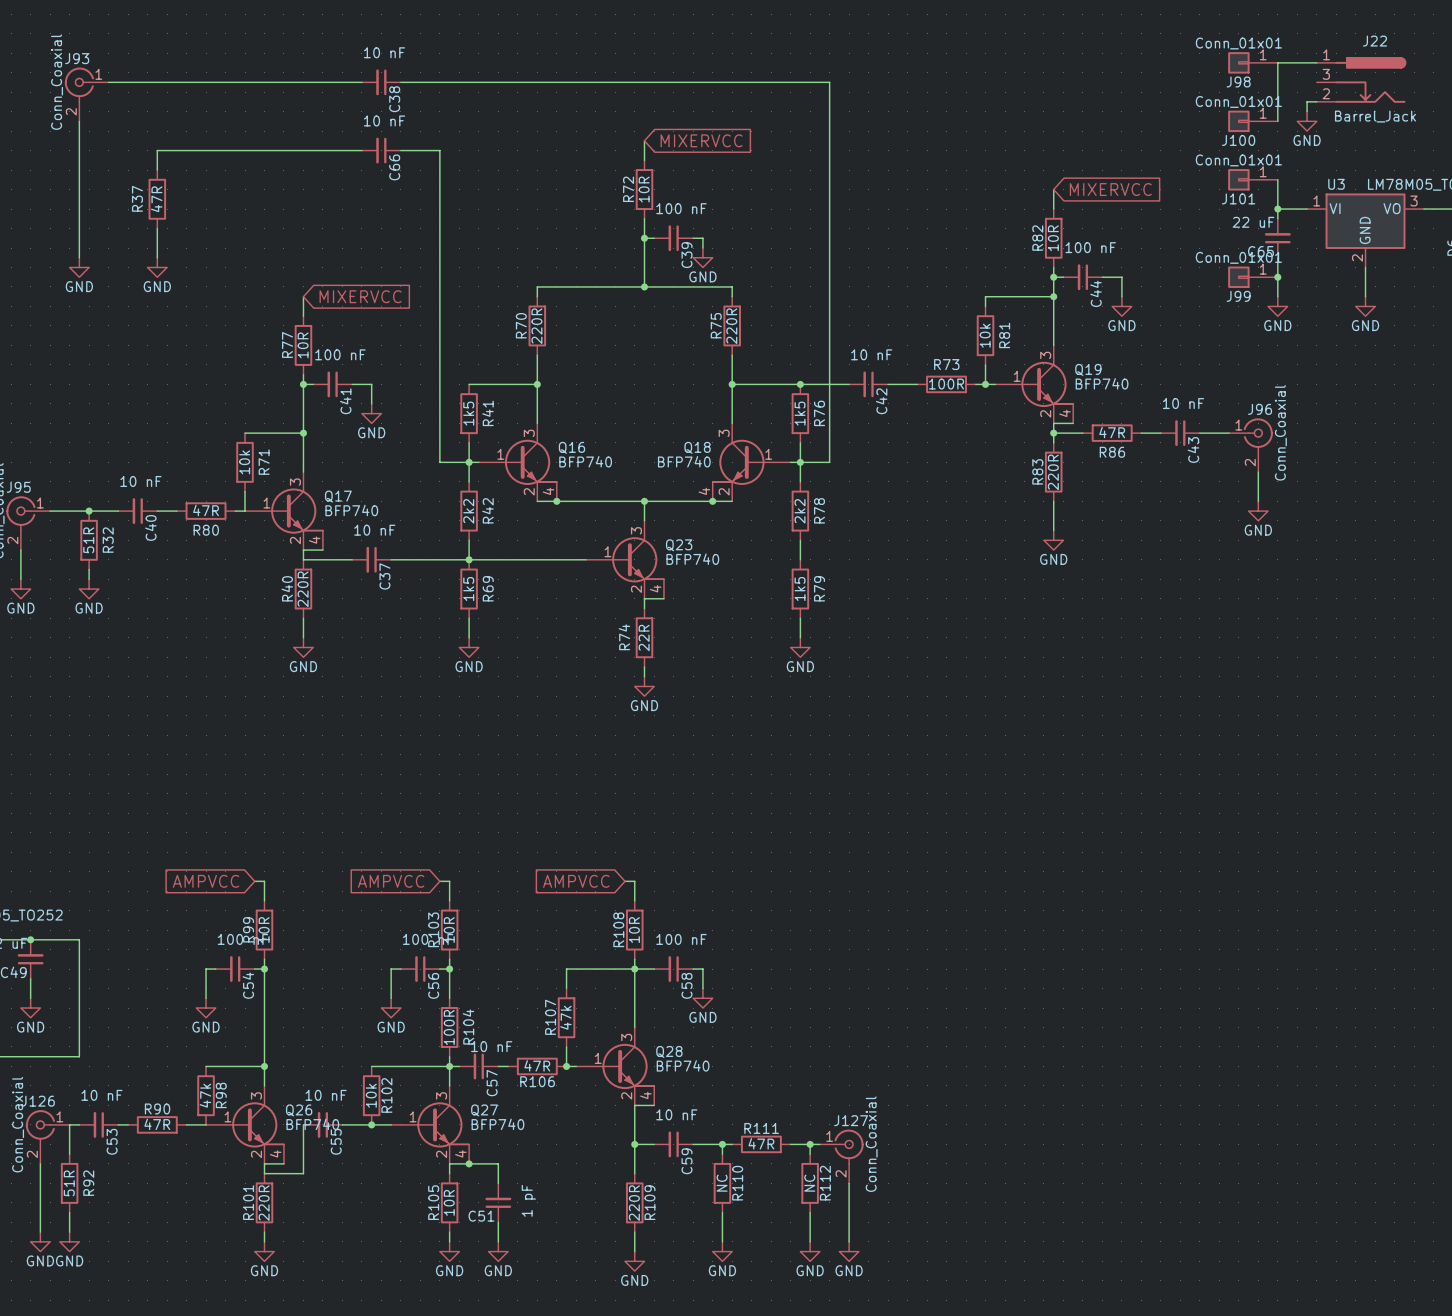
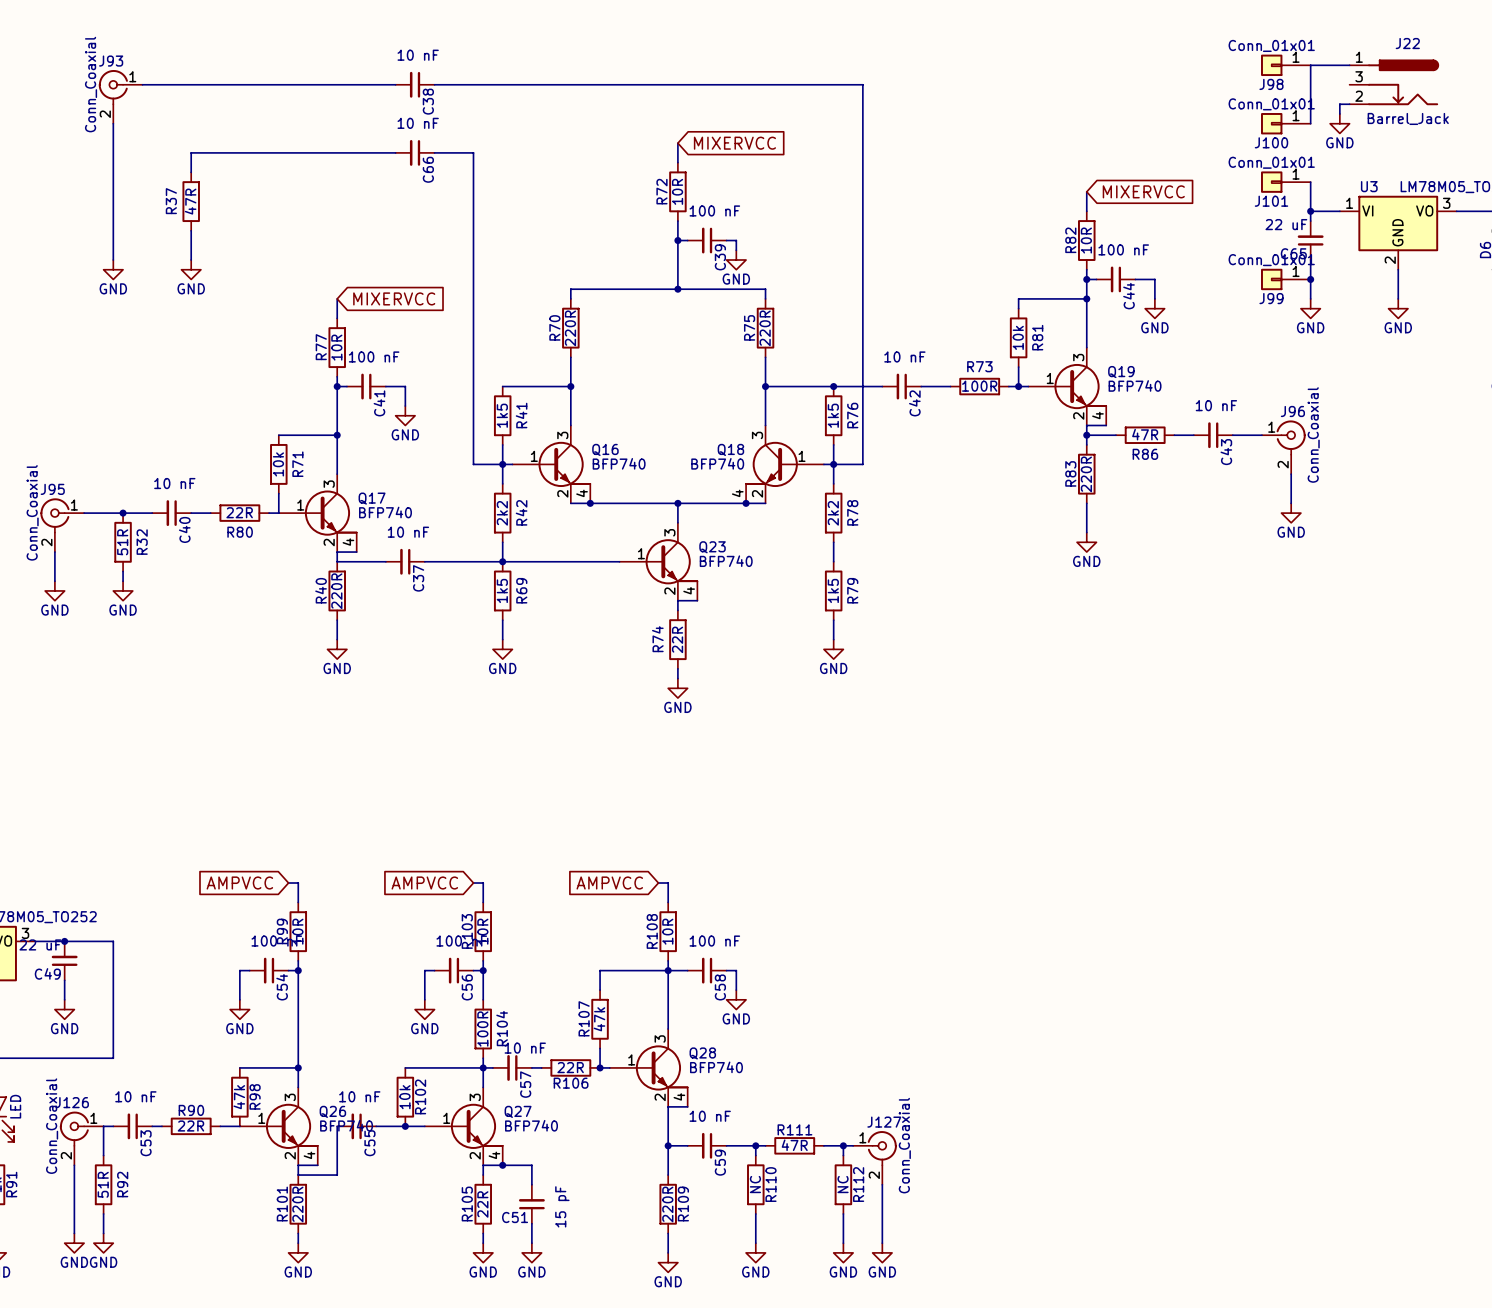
R80 value: 47R (206, 510) -> 22R (239, 512)
R106 value: 47R (537, 1065) -> 22R (570, 1067)
R90 value: 47R (157, 1124) -> 22R (190, 1126)
C51 value: 1 pF (528, 1200) -> 15 pF (562, 1206)
R105 value: 10R (449, 1202) -> 22R (482, 1204)

